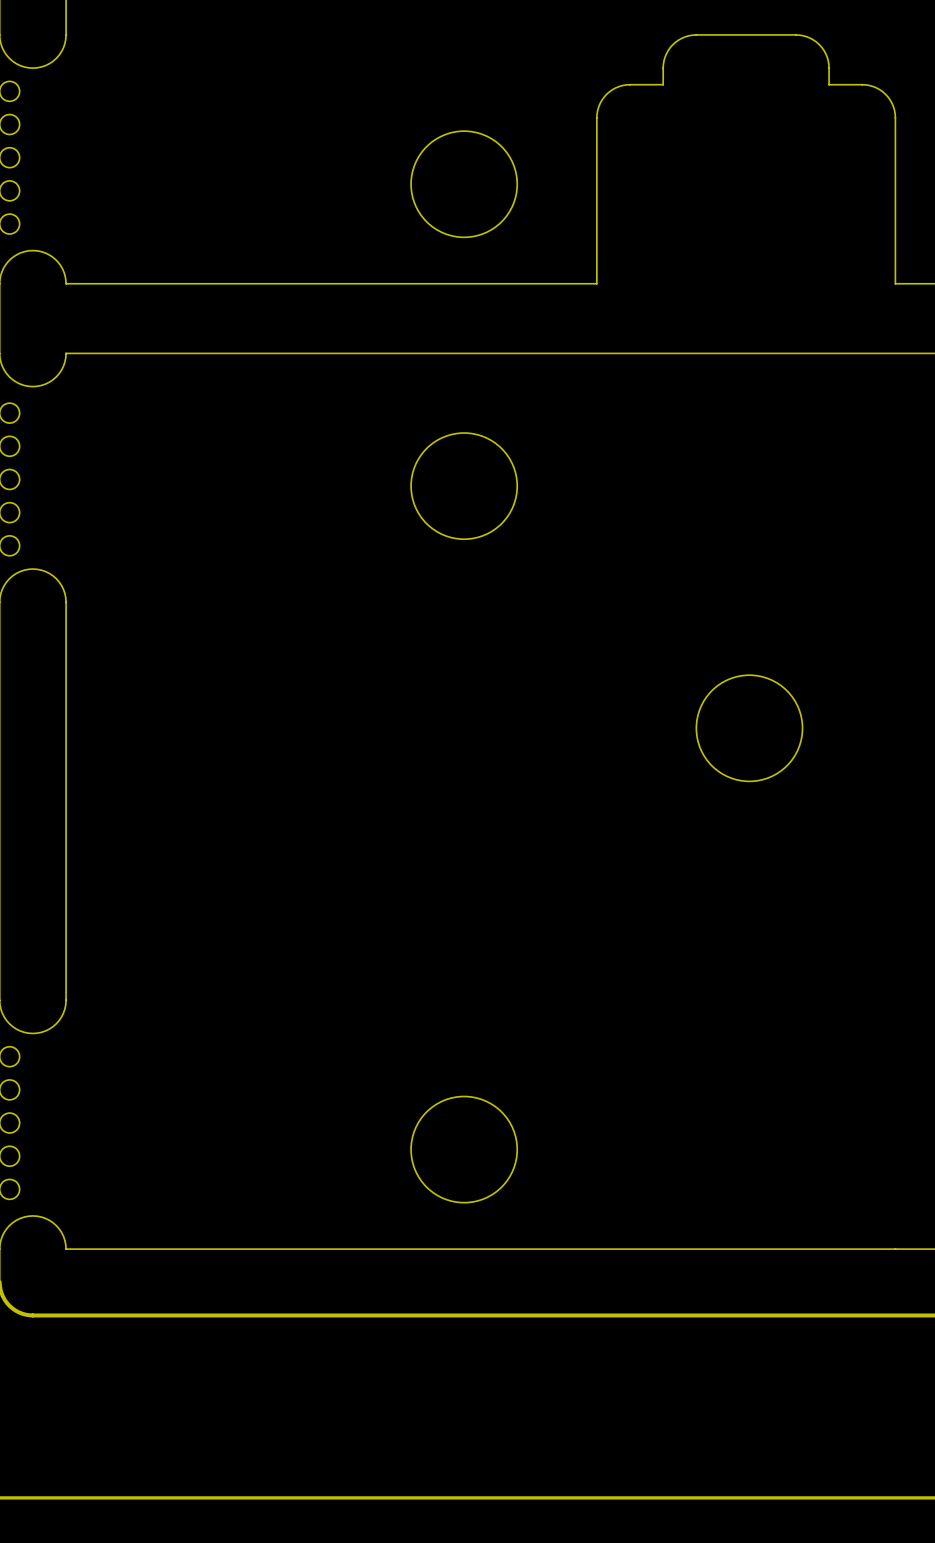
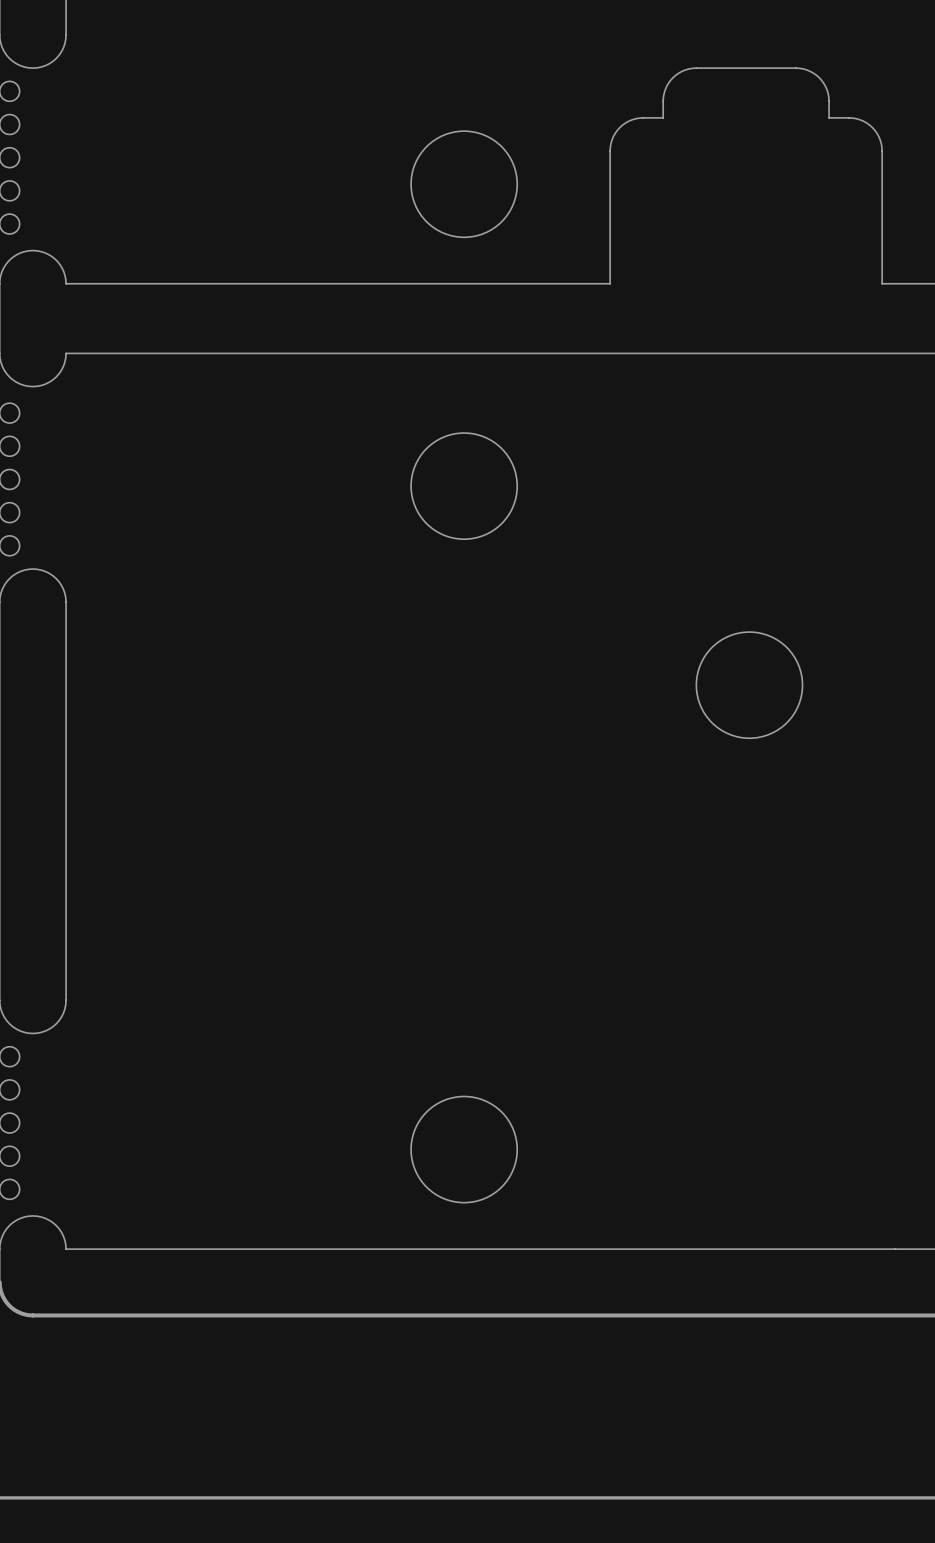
board edge: (895, 283) (895, 117) (893, 106) (885, 94) (873, 86) (829, 84) (828, 64) (823, 50) (813, 40) (795, 34) (696, 34) (685, 36) (672, 44) (666, 53) (663, 64) (663, 84) (622, 85) (612, 89) (604, 97) (598, 106) (596, 117) (596, 283) -> (895, 283) (882, 283) (882, 151) (878, 136) (872, 127) (859, 119) (829, 117) (828, 97) (823, 83) (810, 71) (795, 68) (696, 68) (685, 69) (675, 75) (666, 86) (663, 97) (663, 117) (635, 118) (619, 127) (613, 136) (610, 147) (610, 283) (596, 283)
round board edge position: (749, 728) -> (749, 685)

